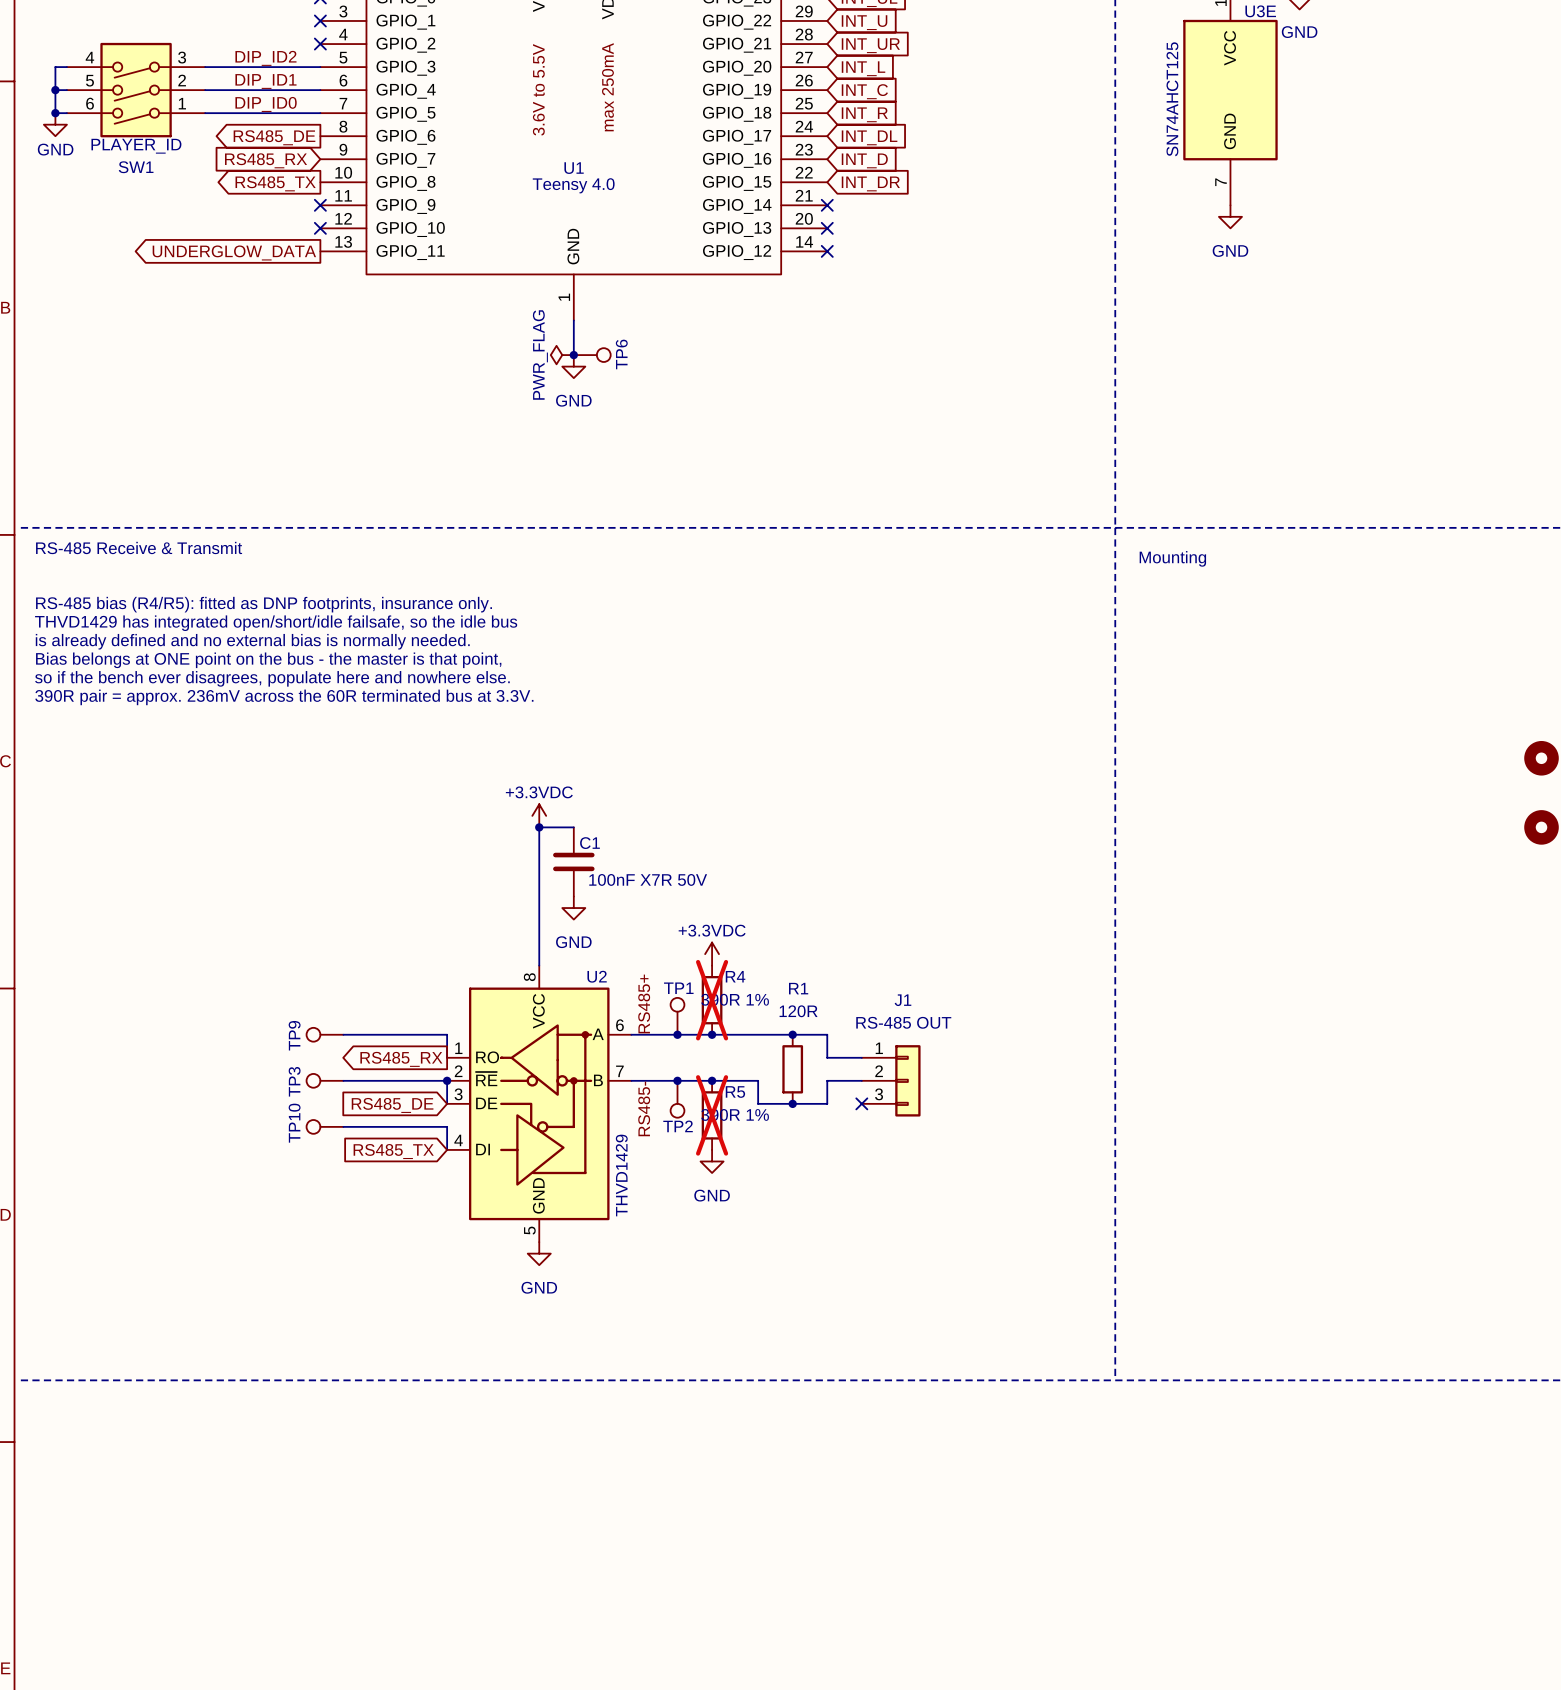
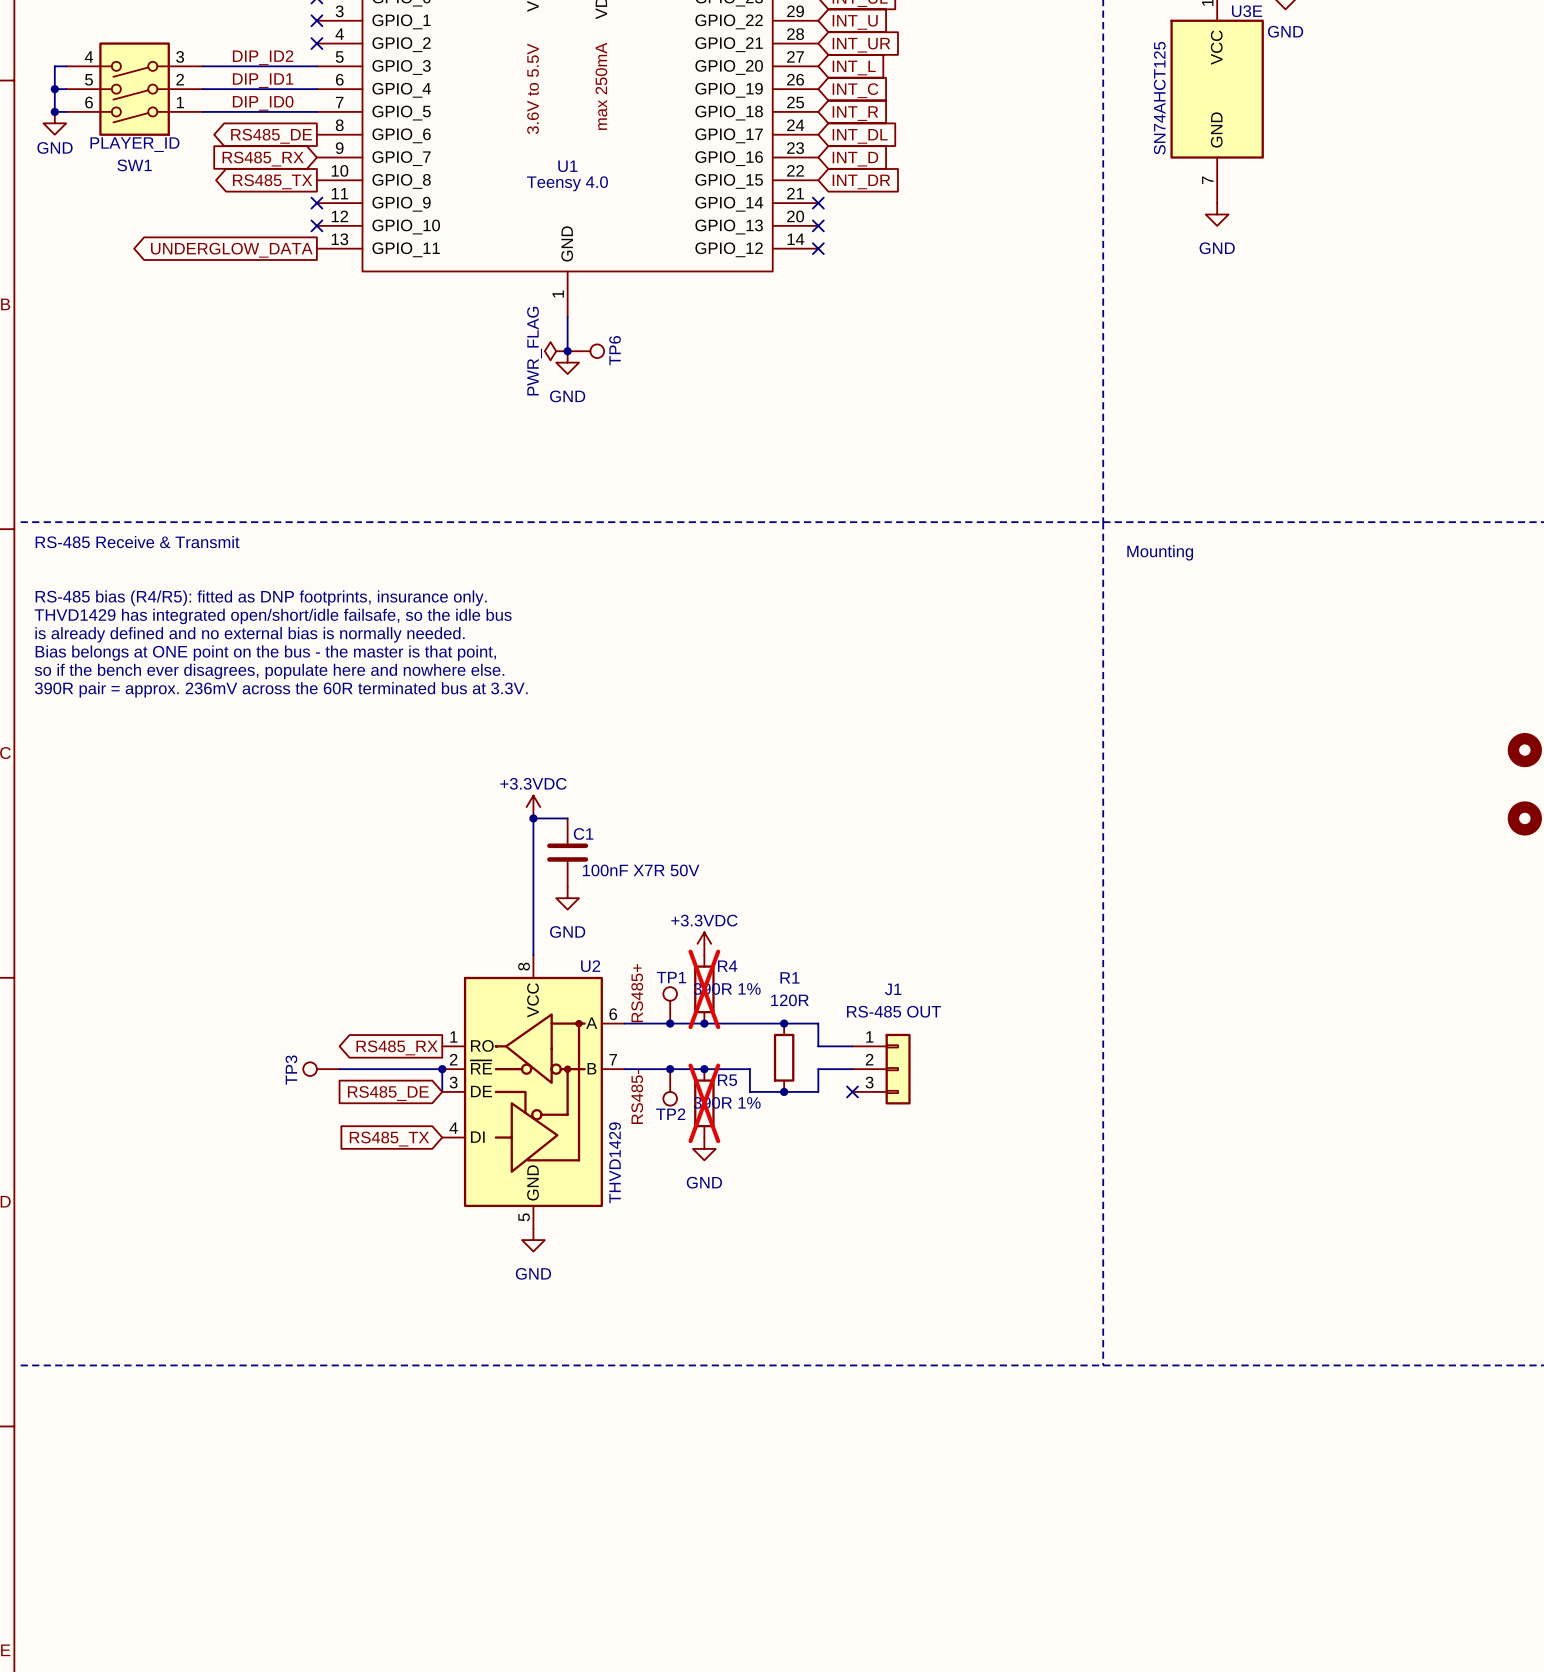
TP9: (324, 1034) -> none
wire: (343, 1034) (447, 1034) (447, 1057) -> none
TP10: (324, 1126) -> none
wire: (343, 1126) (447, 1126) (447, 1149) -> none

